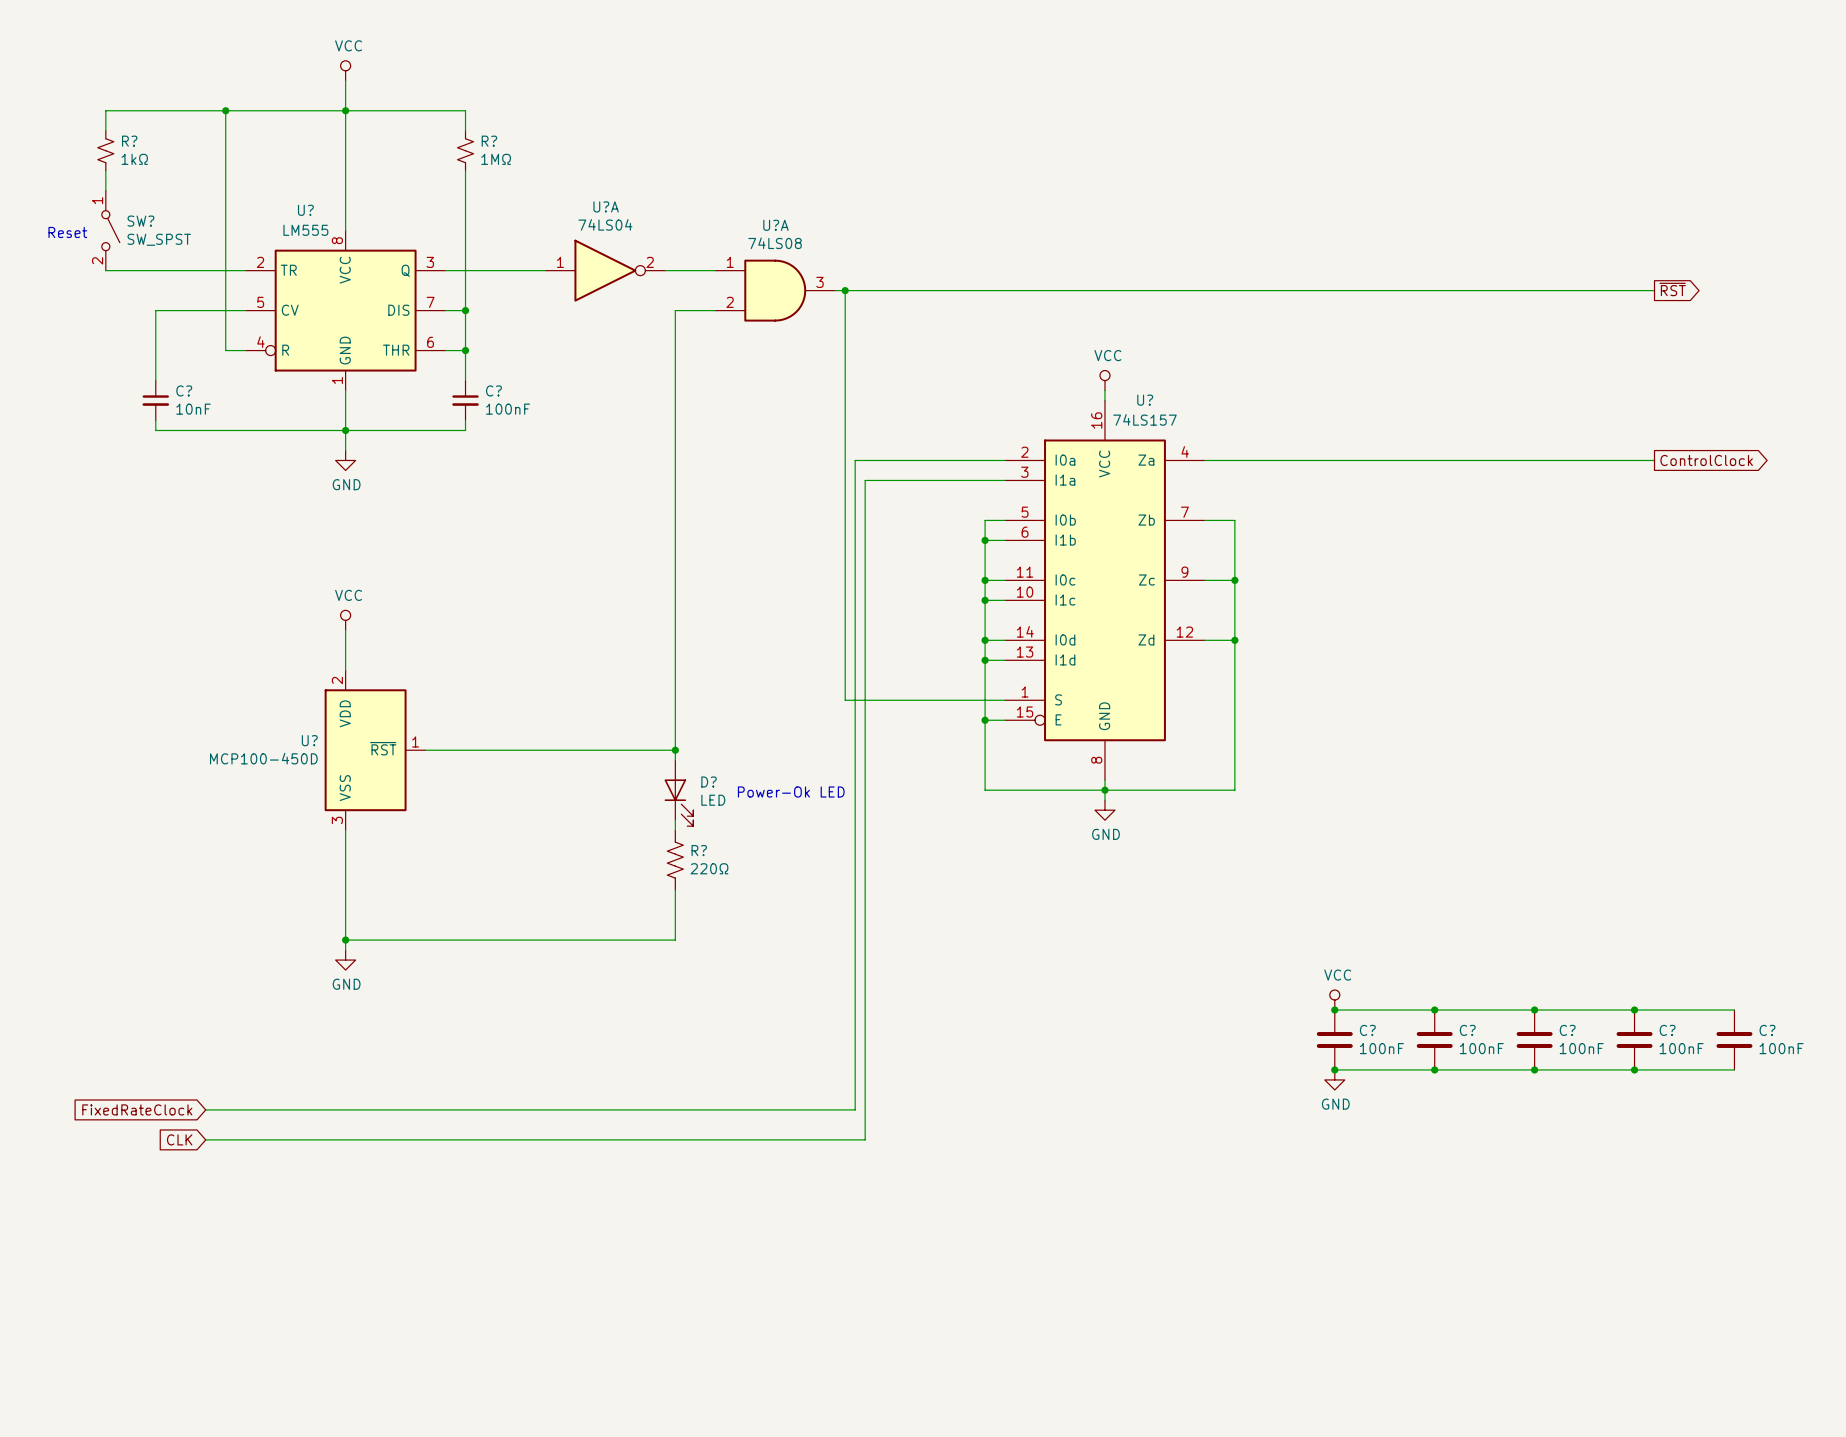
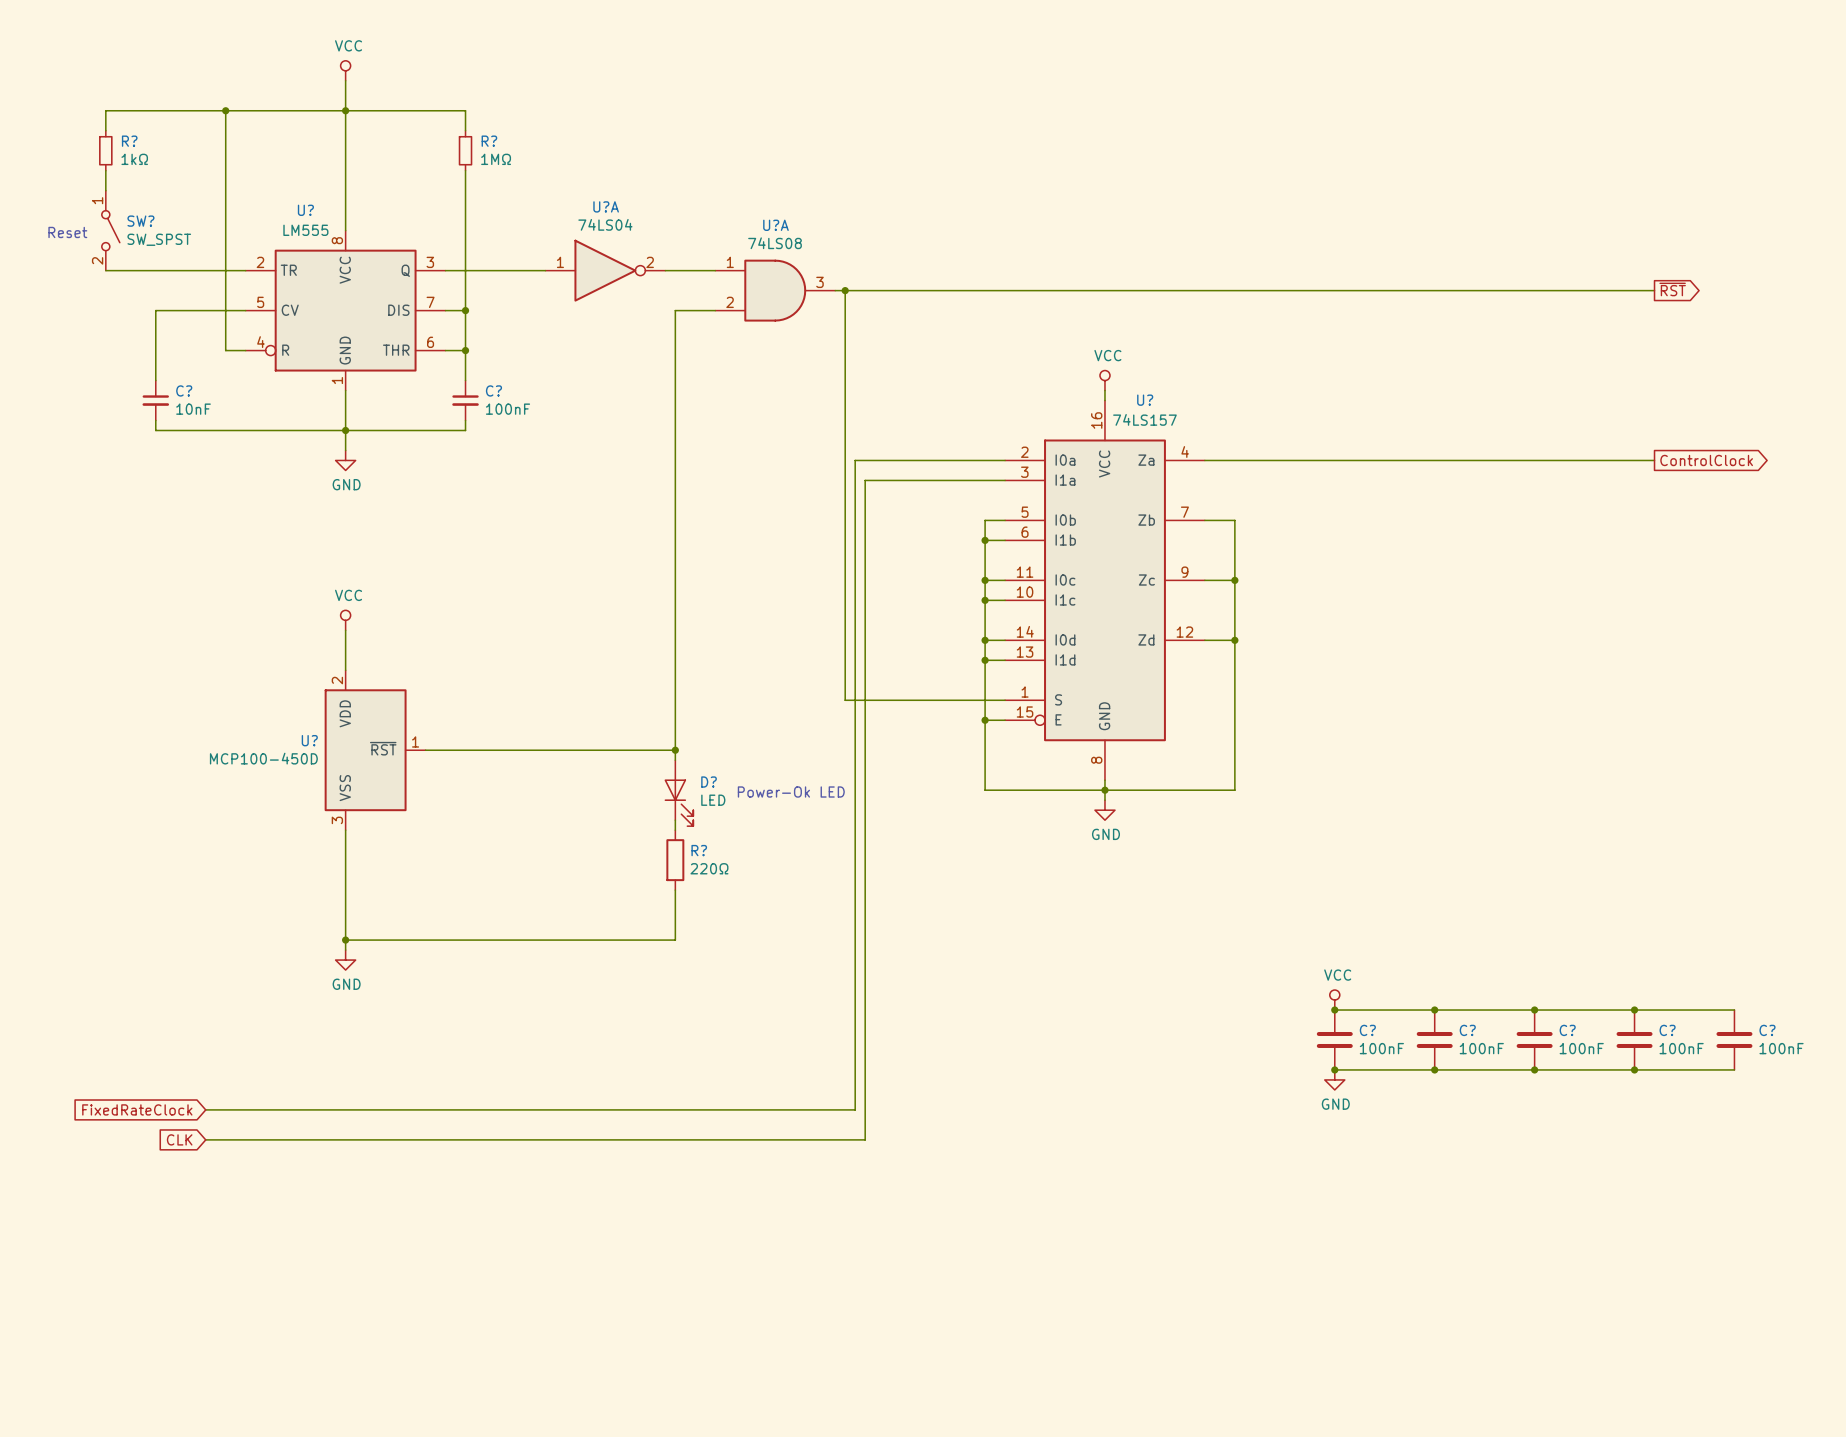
R? symbol: [97, 130, 114, 171] -> [99, 130, 113, 171]
R? symbol: [457, 130, 474, 171] -> [458, 130, 473, 171]
R? symbol: [667, 830, 684, 891] -> [666, 830, 685, 891]

